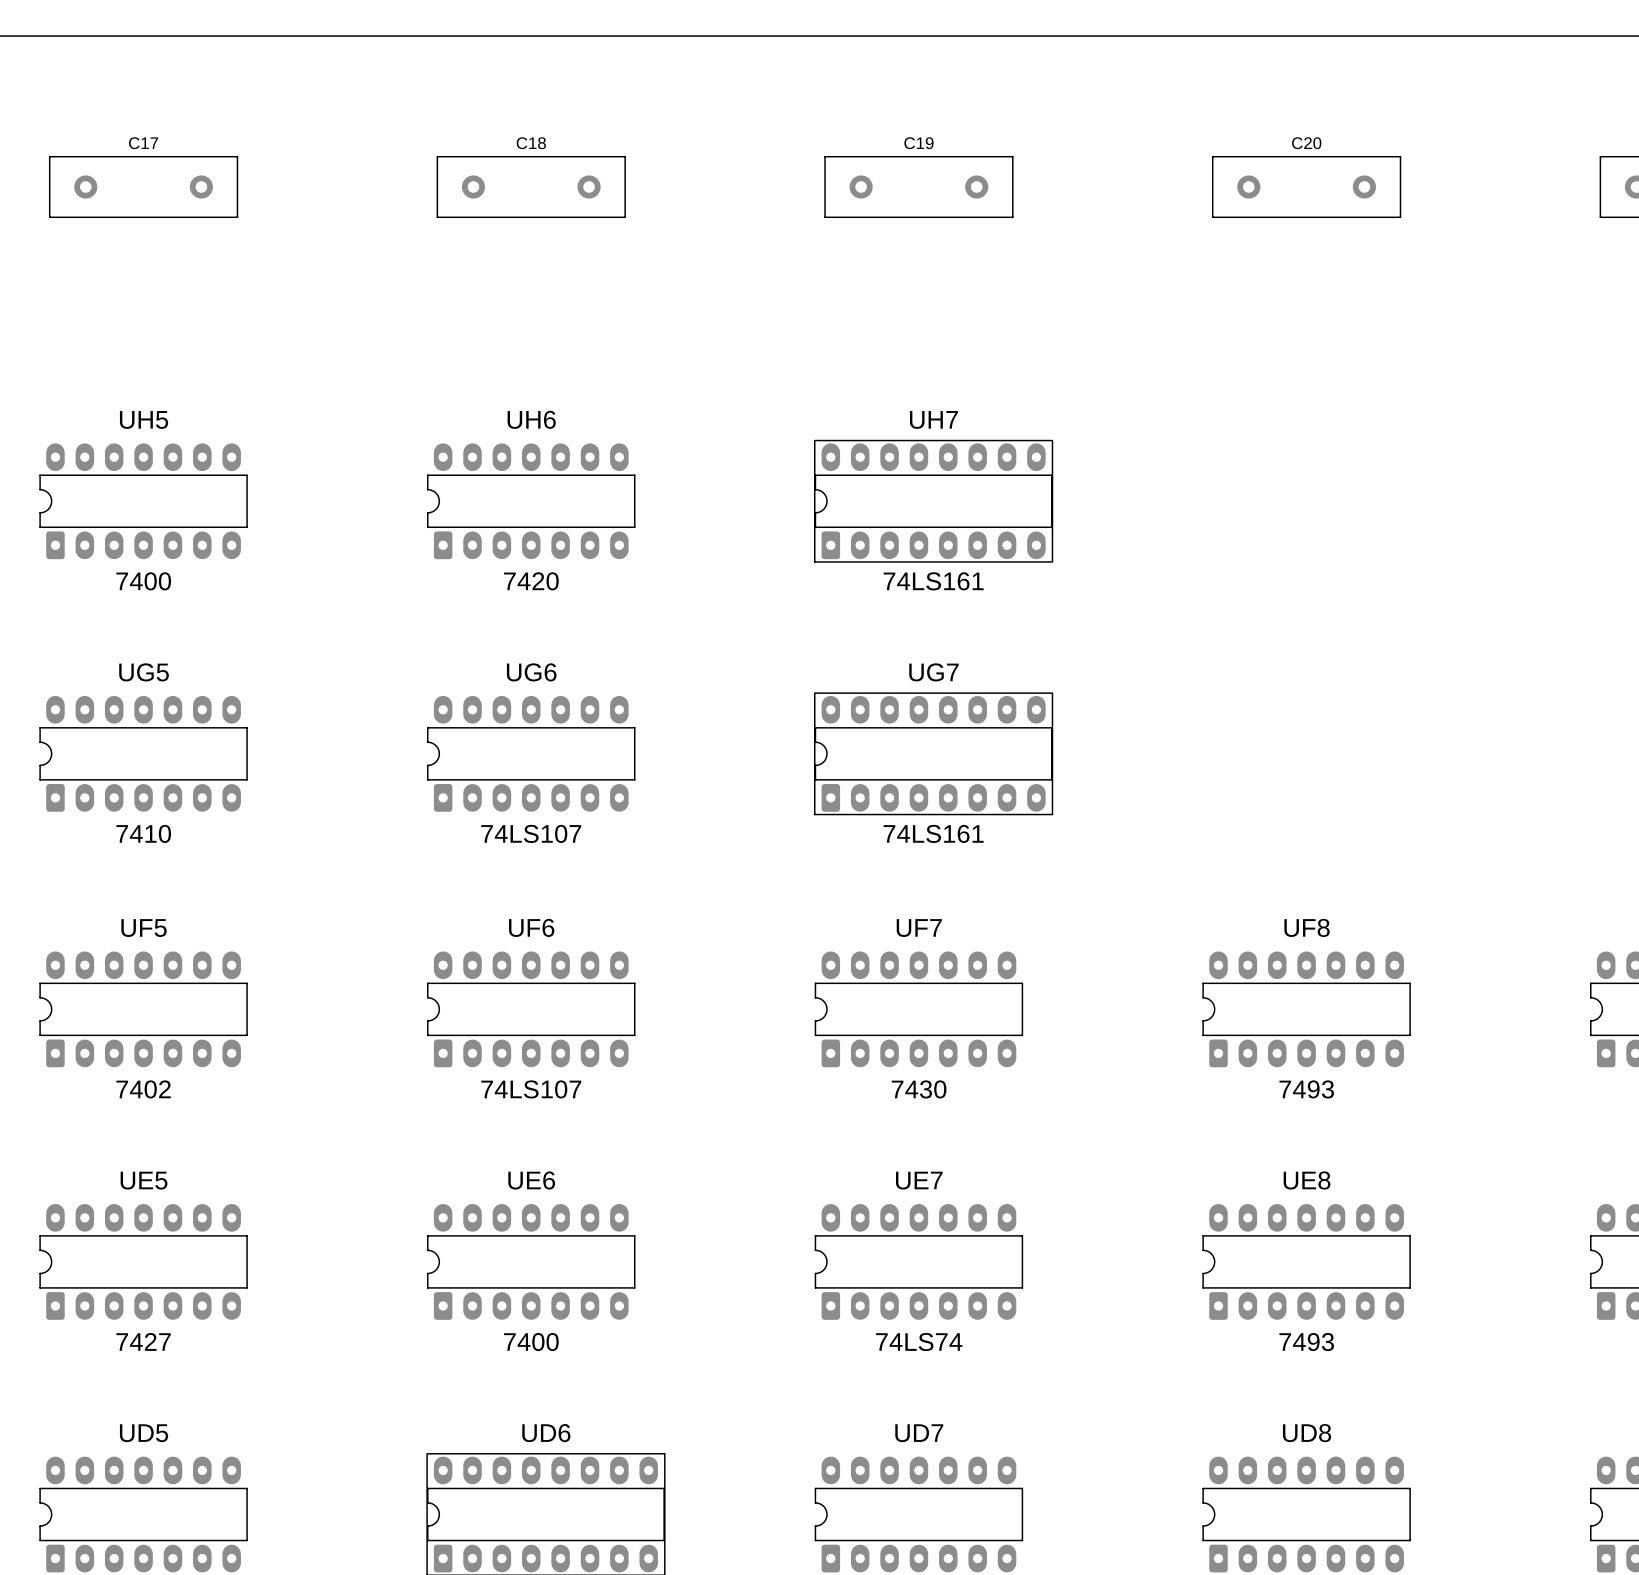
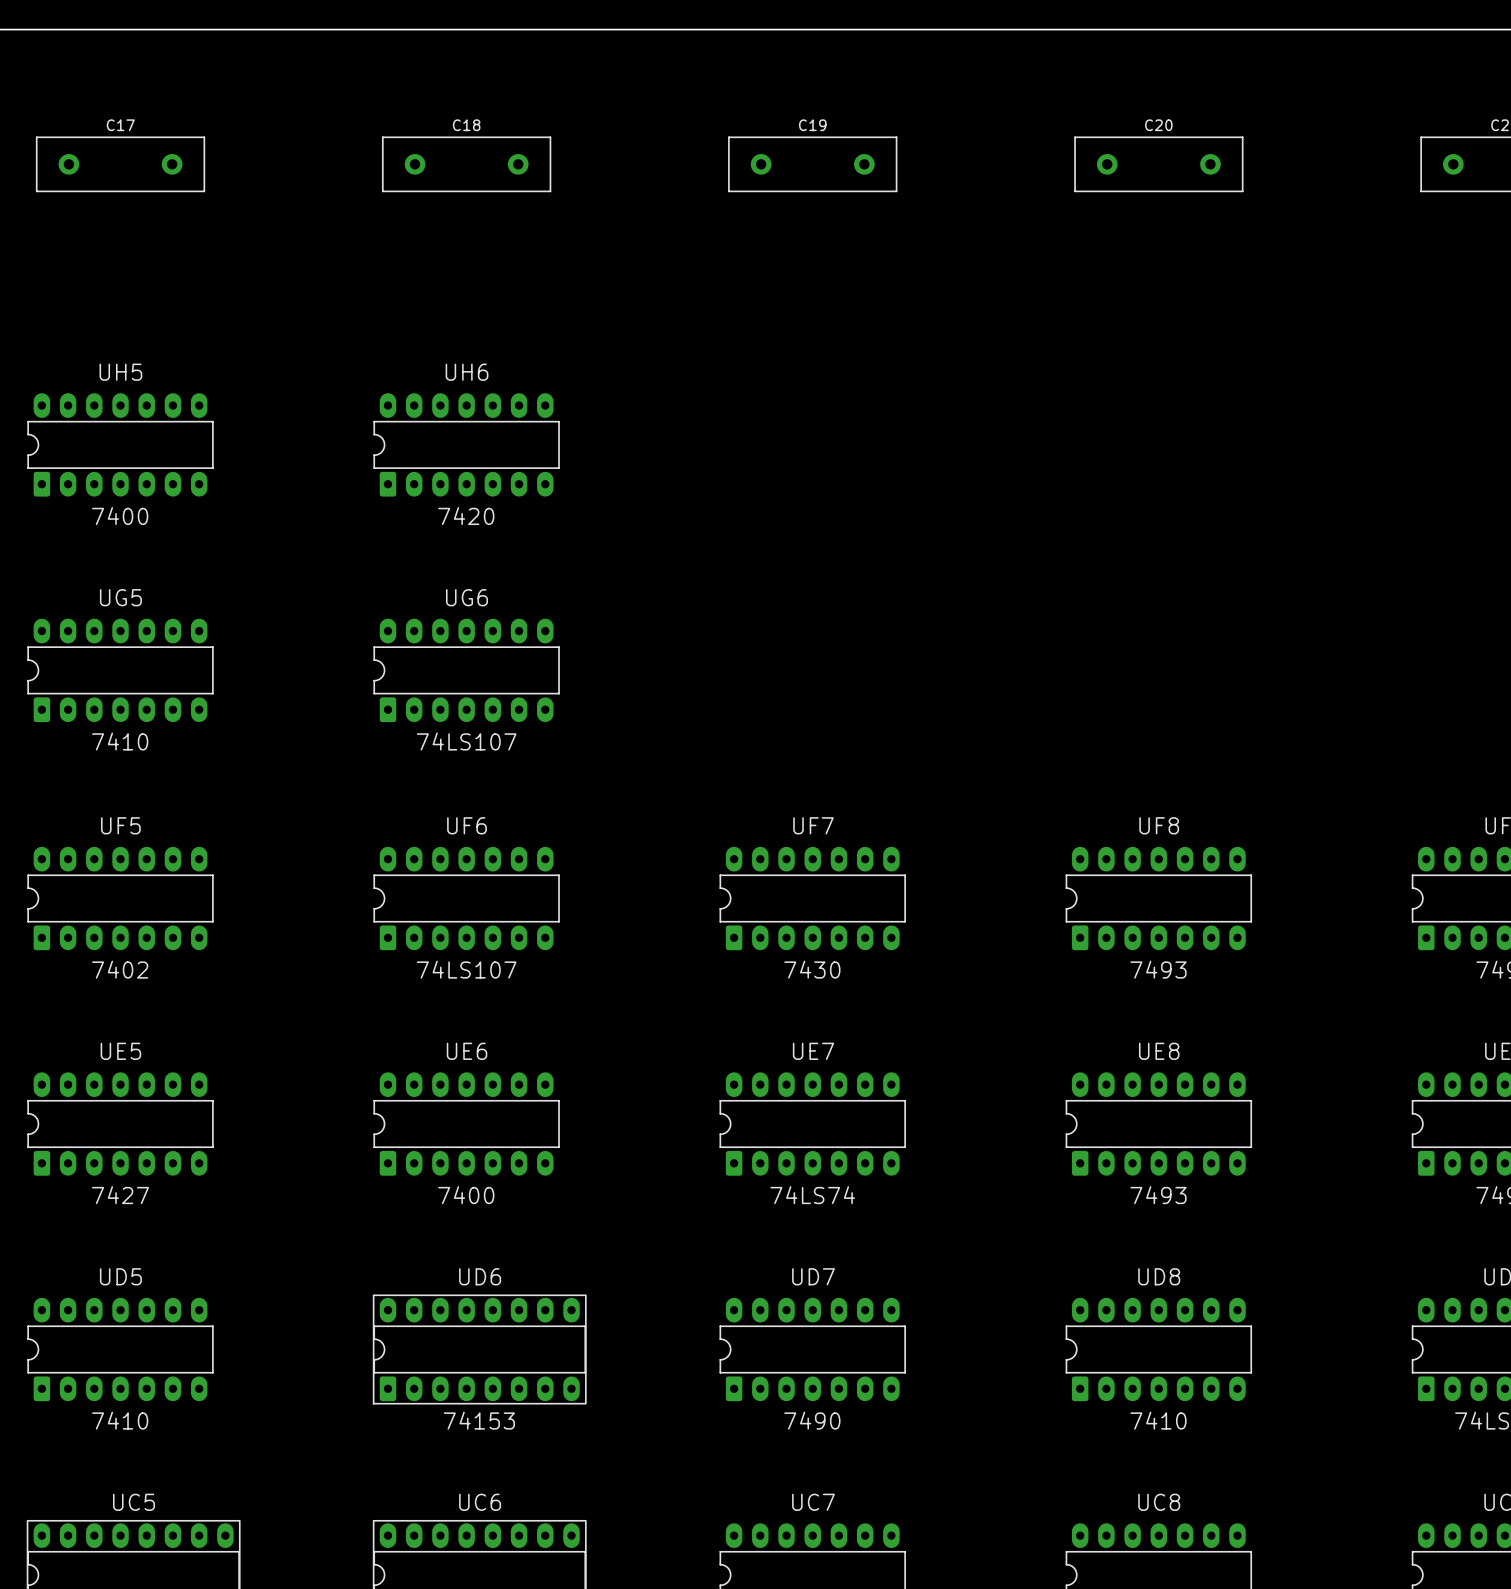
UH7: 74LS161 (933, 501) -> none
UG7: 74LS161 (933, 753) -> none

